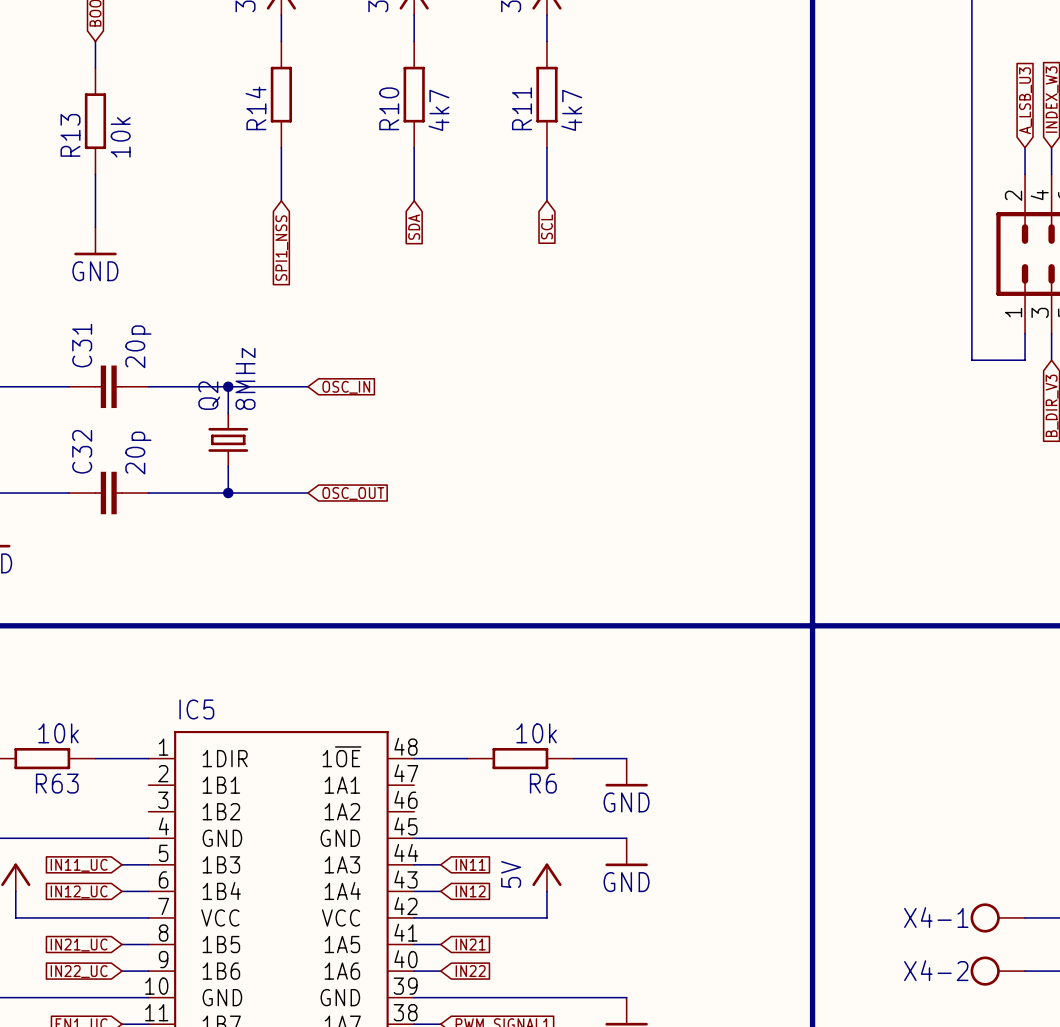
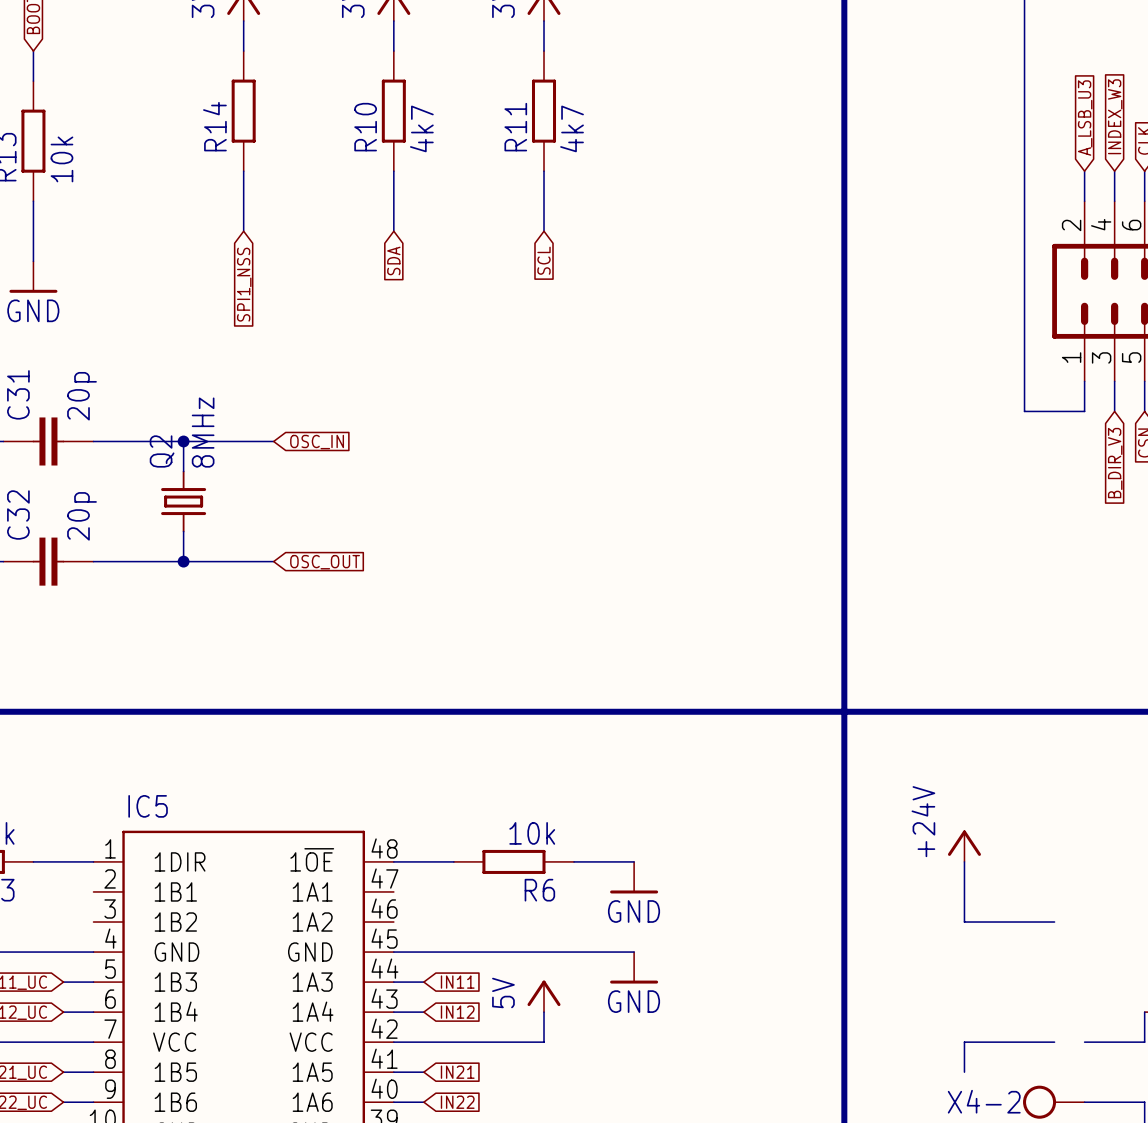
power symbol: none -> +24V (964, 846)
wire: none -> (964, 861) (964, 922) (1054, 922)
X4-1: (997, 917) -> none
wire: none -> (1054, 1042) (964, 1042) (964, 1072)

